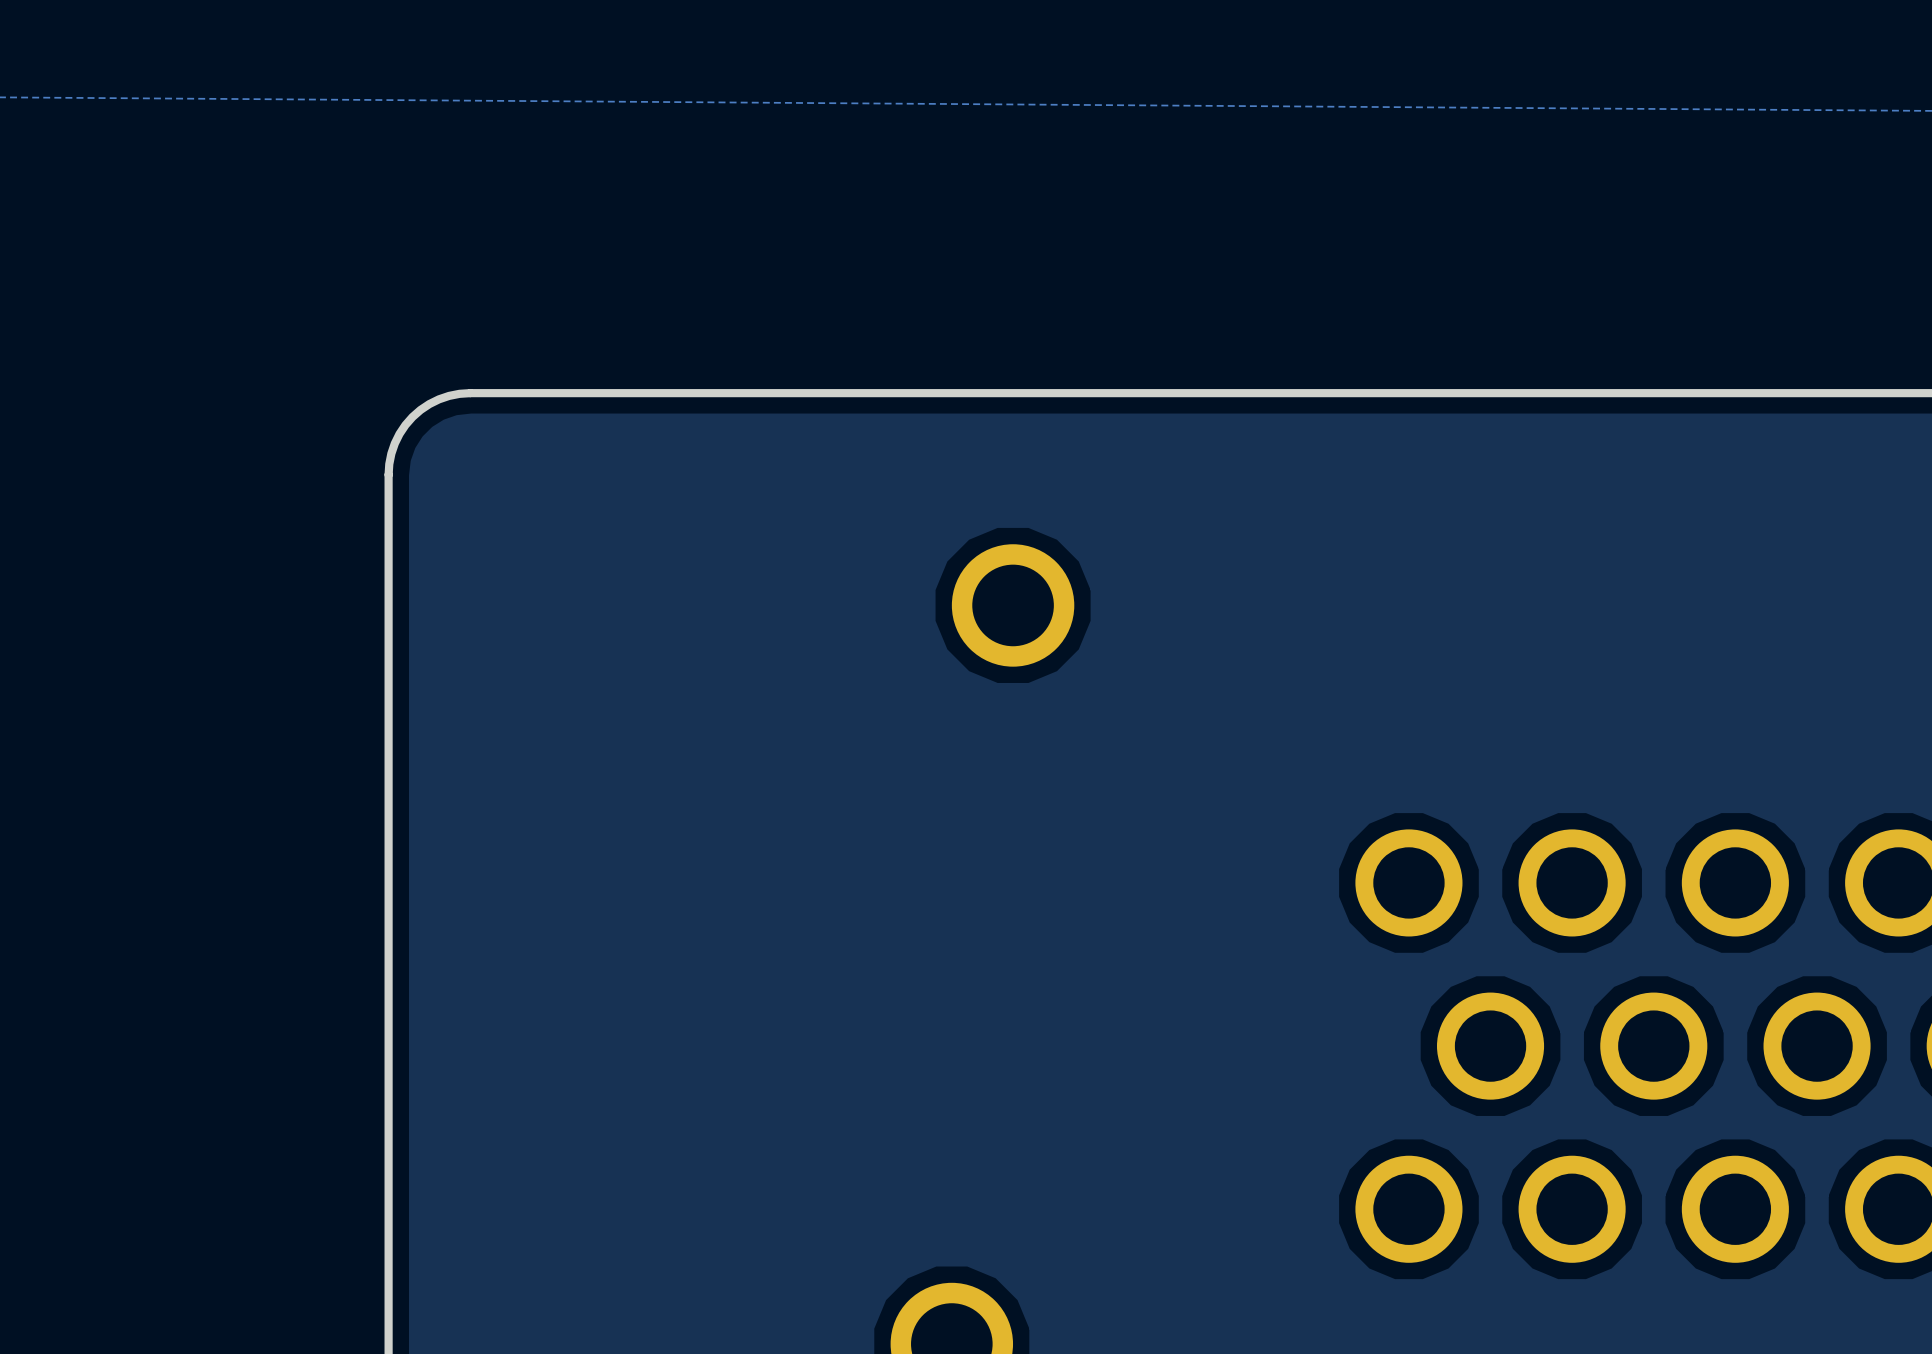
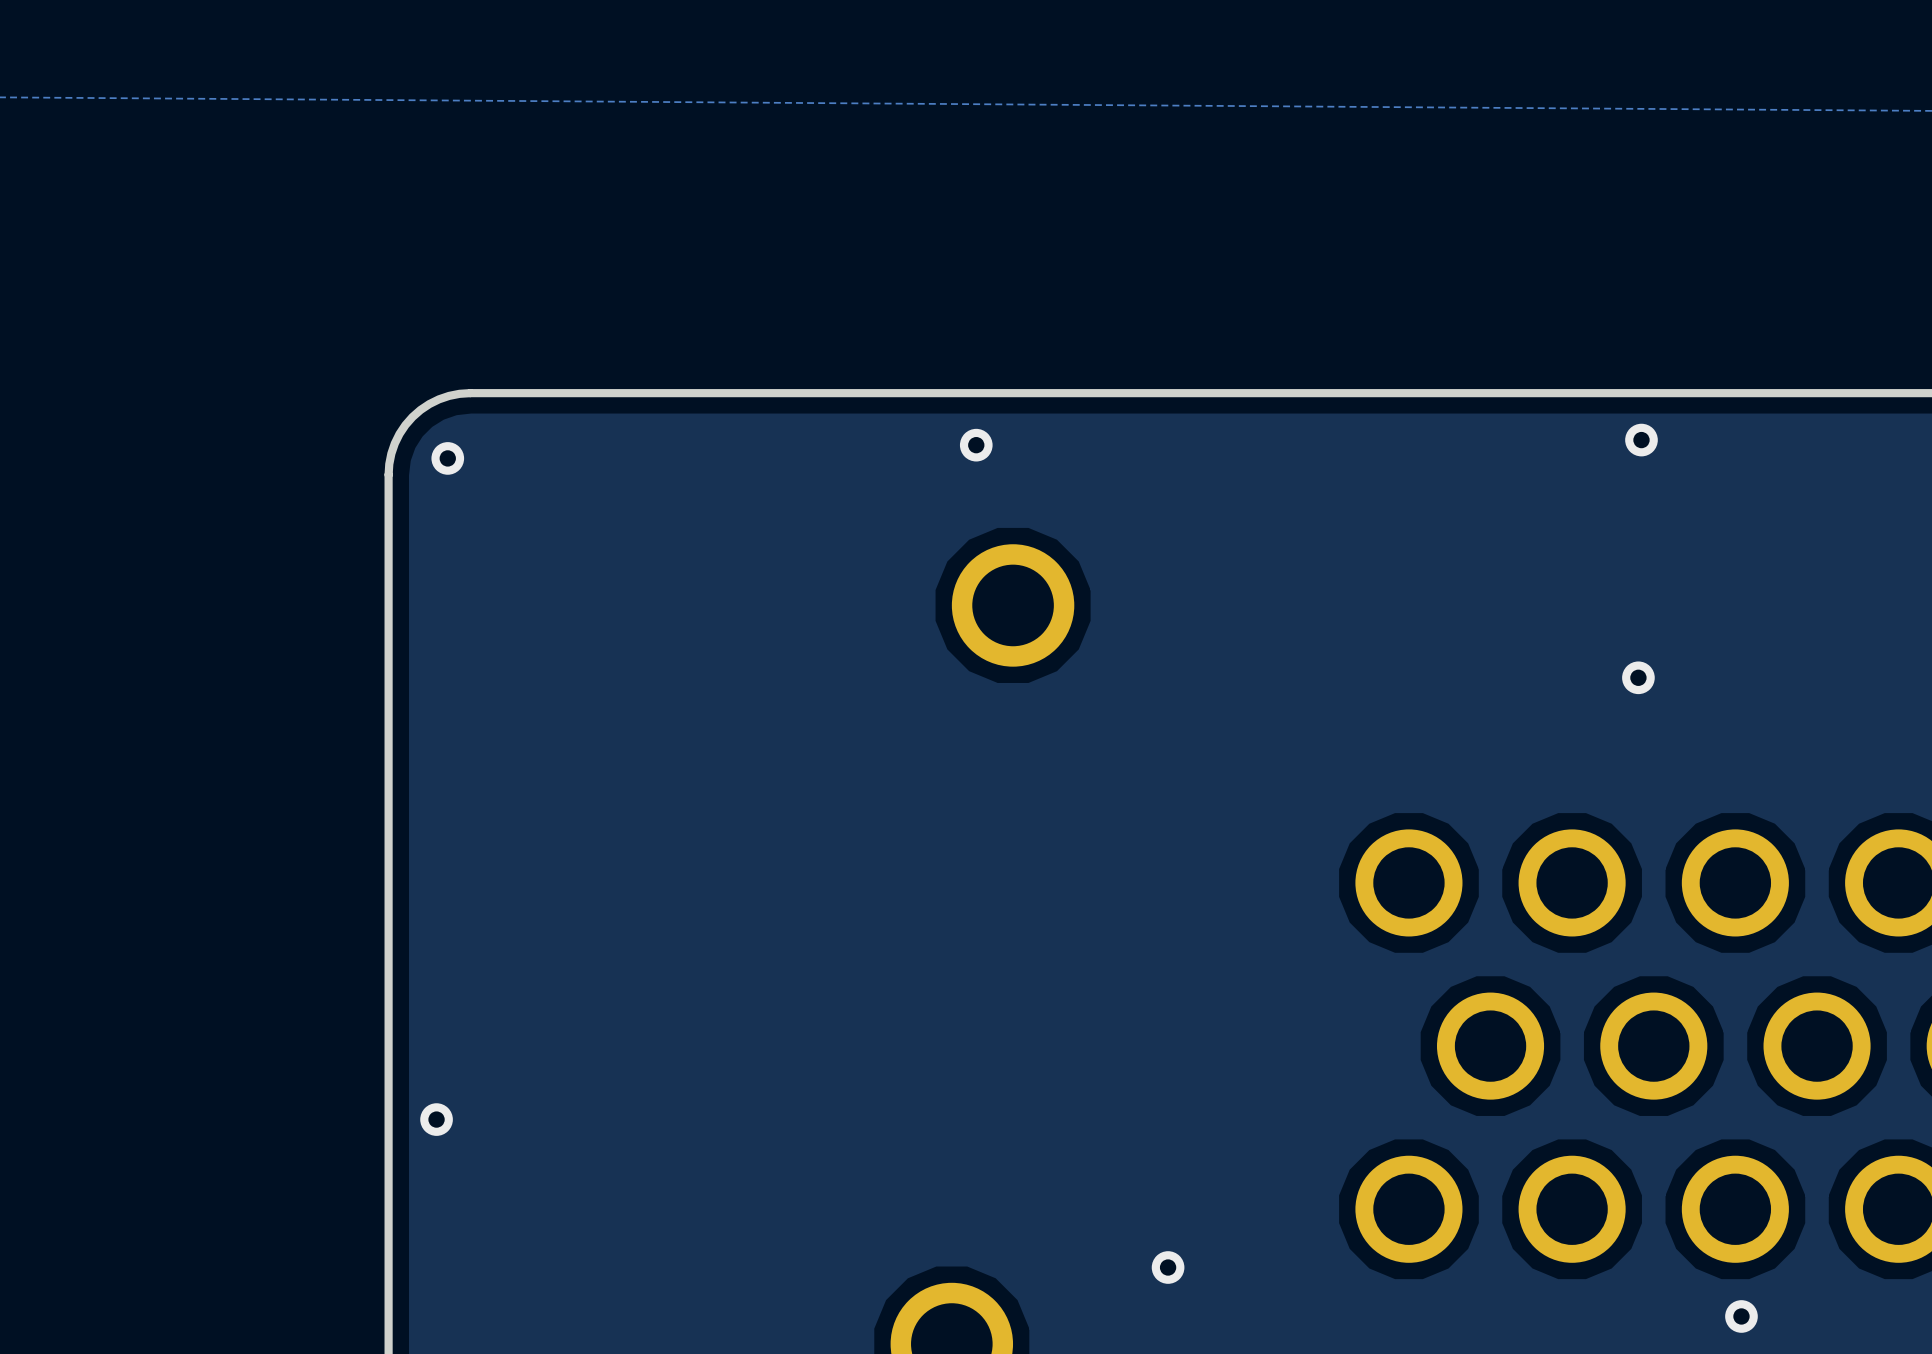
via: none -> (1641, 440)
via: none -> (976, 445)
via: none -> (447, 458)
via: none -> (1638, 677)
via: none -> (436, 1119)
via: none -> (1168, 1267)
via: none -> (1741, 1316)

